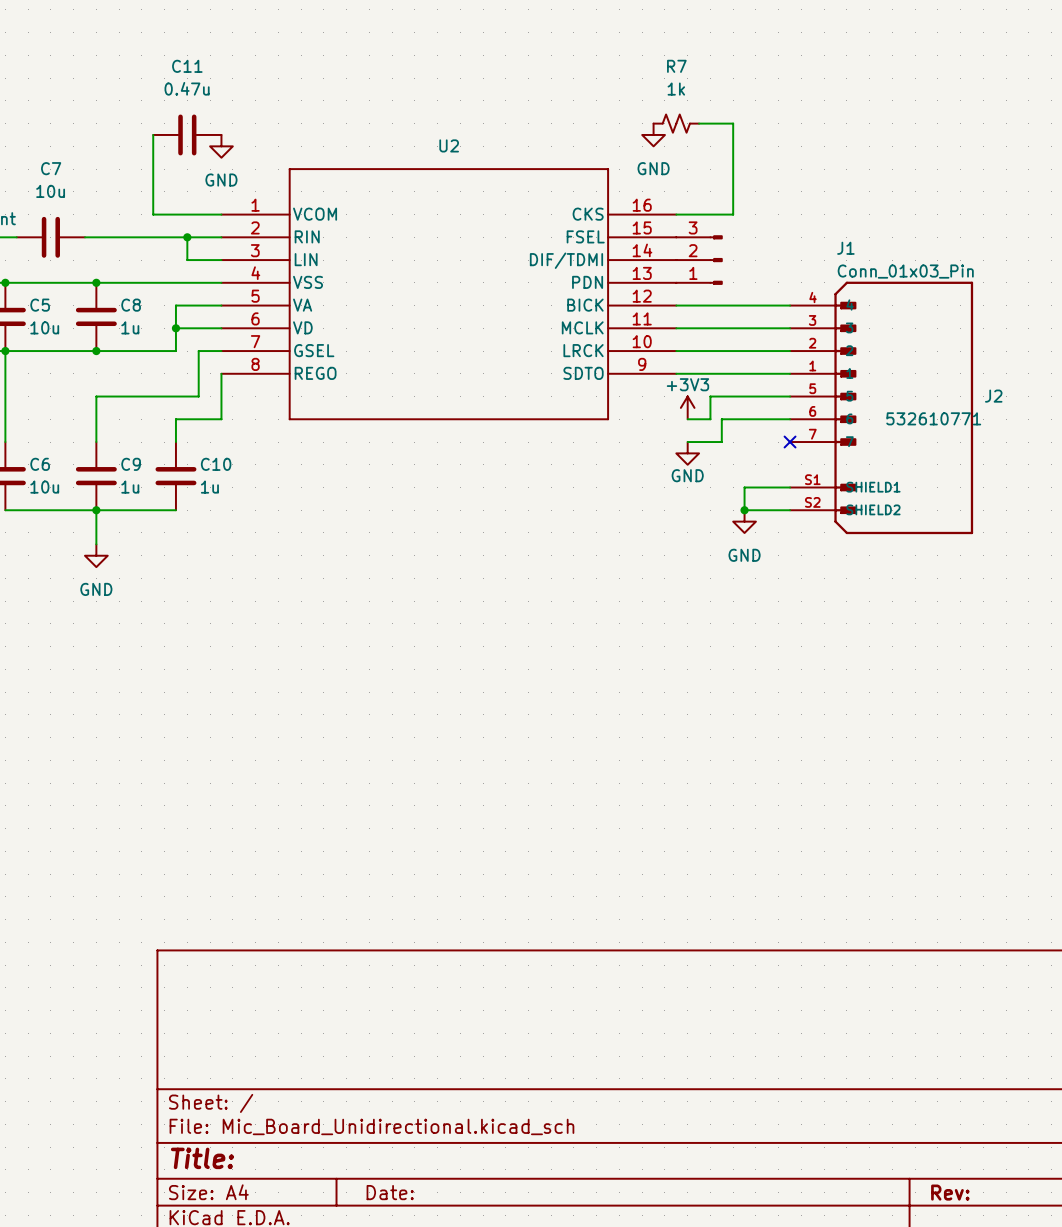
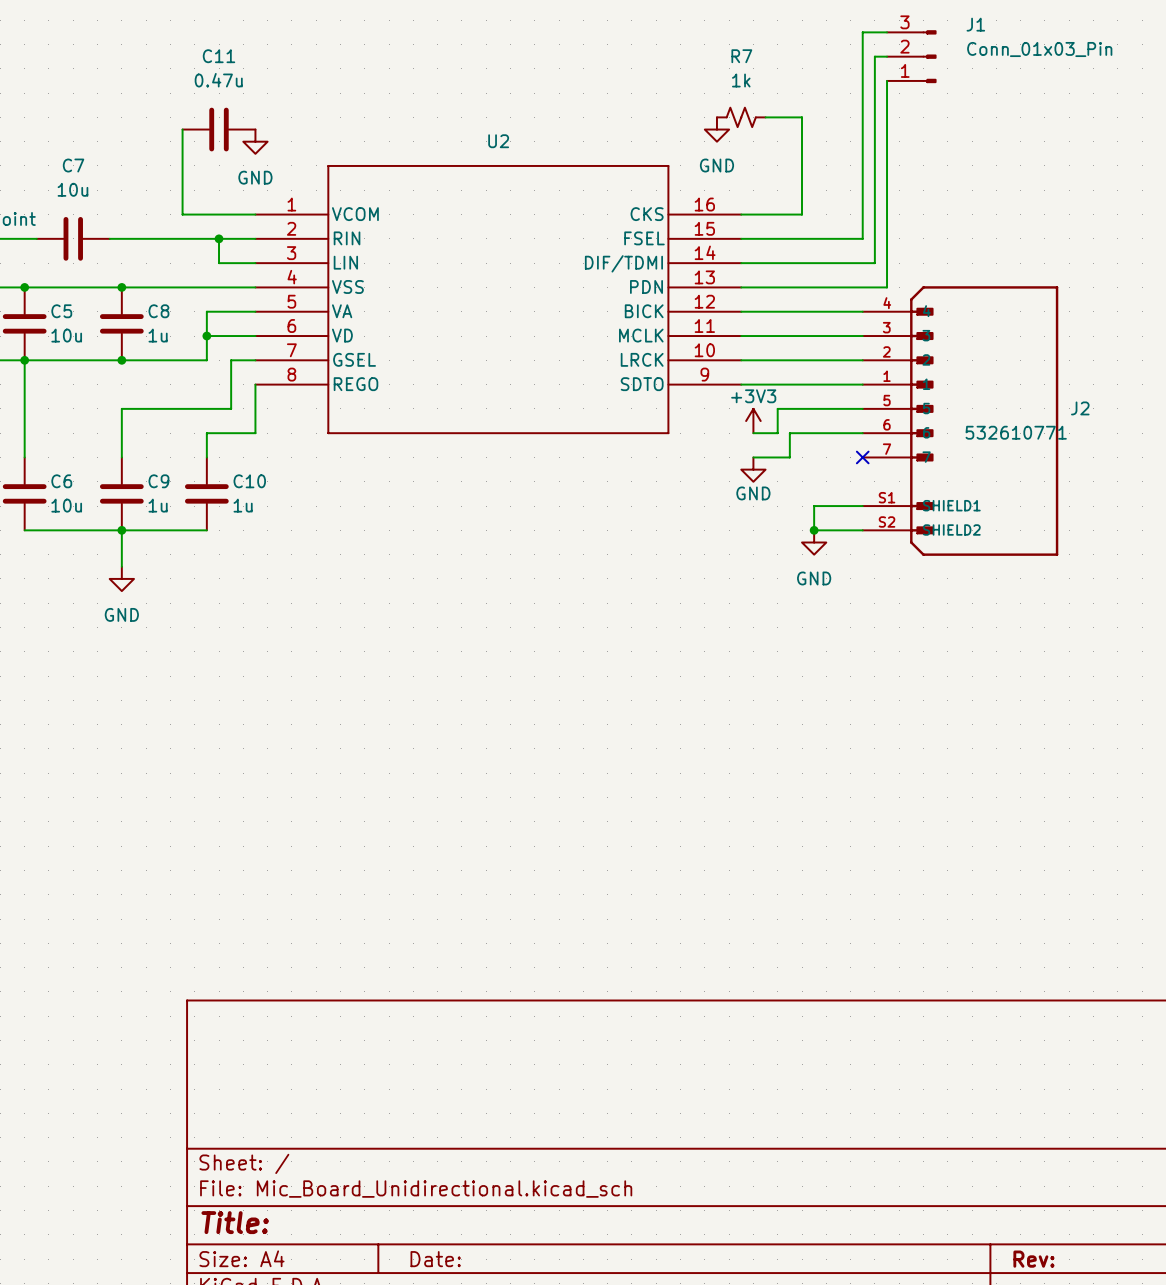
wire: none -> (887, 32) (862, 32) (862, 238) (741, 238)
wire: none -> (887, 56) (874, 56) (874, 263) (741, 263)
wire: none -> (887, 80) (887, 287) (741, 287)
J1 name position: J1 (845, 248) -> J1 (975, 24)
J1 position: (699, 260) -> (911, 56)
J1 value position: Conn_01x03_Pin (905, 271) -> Conn_01x03_Pin (1039, 49)

